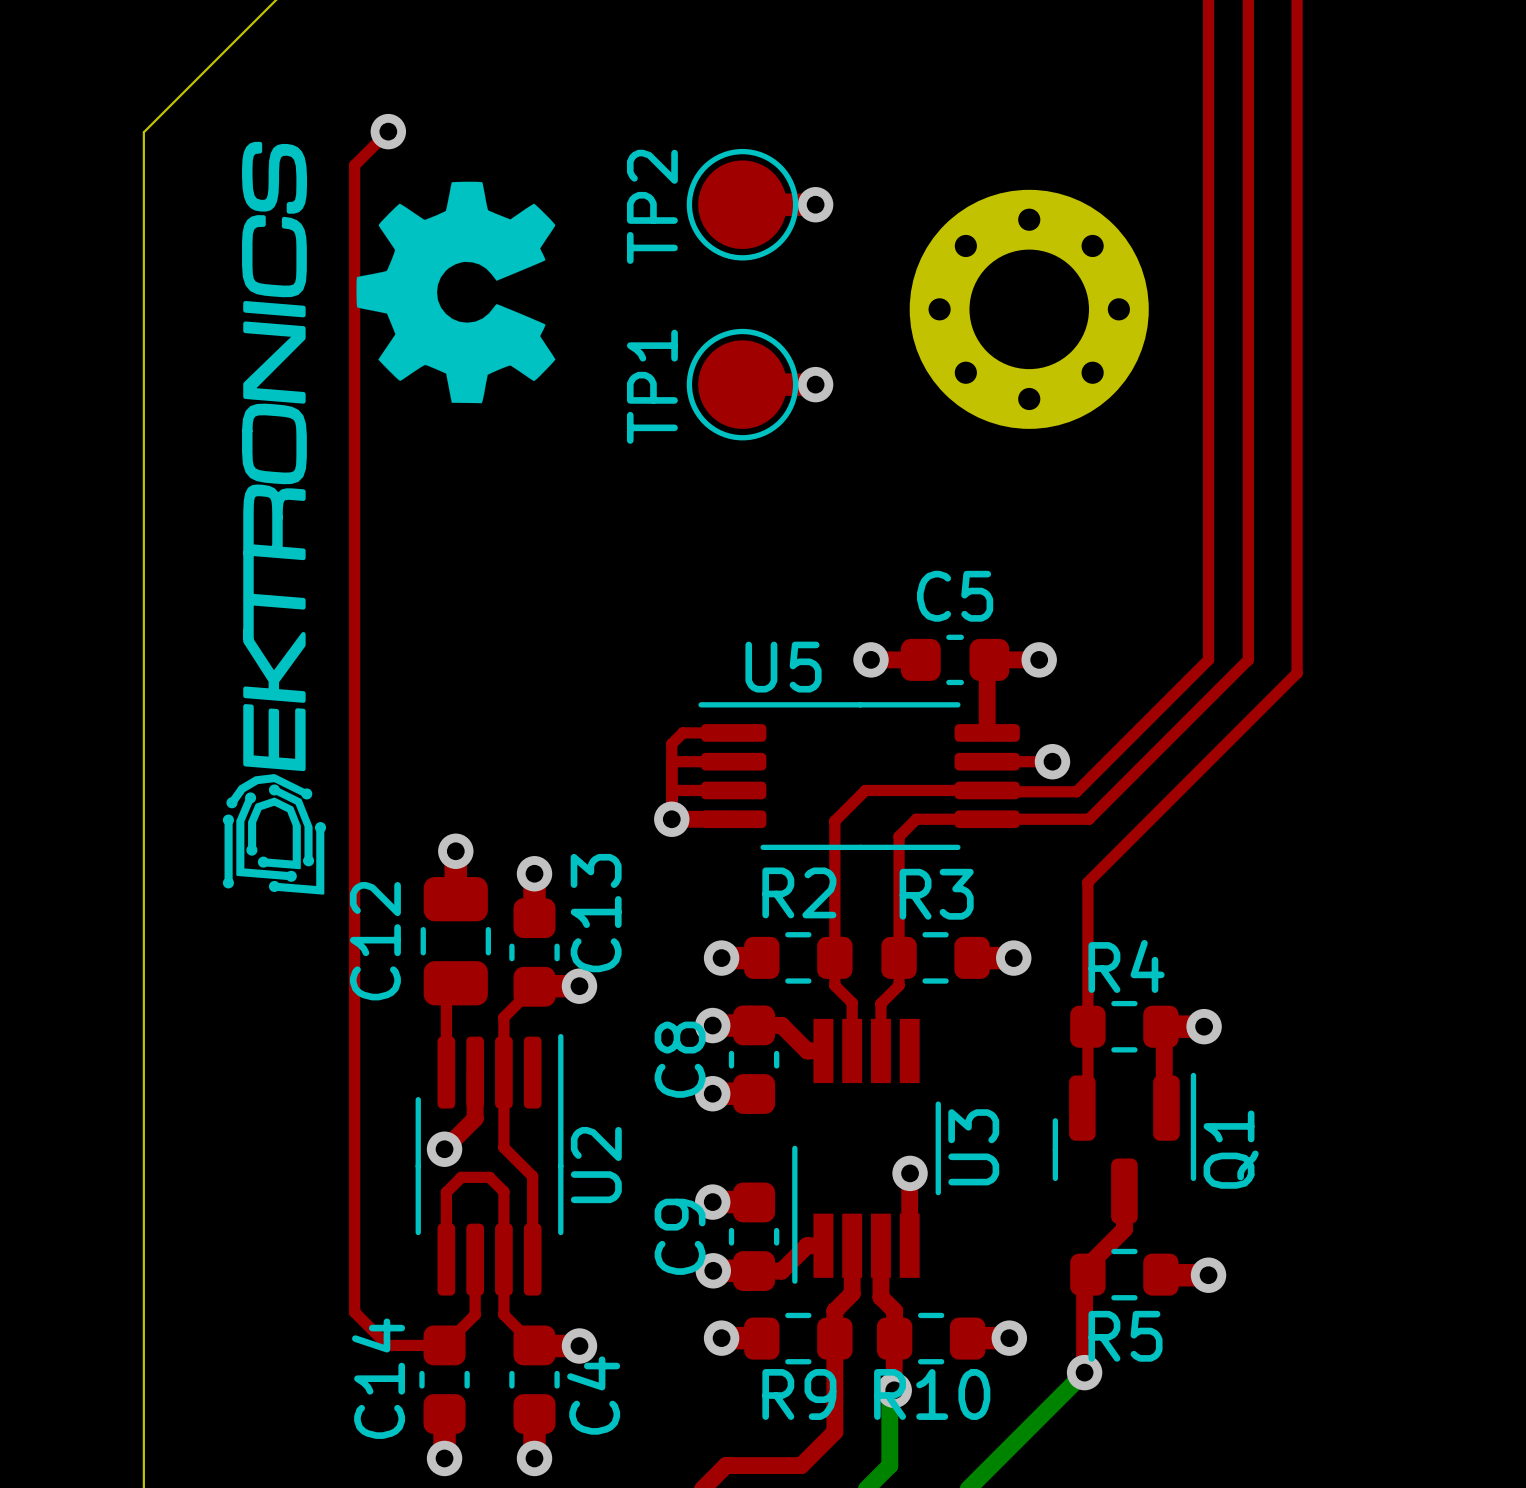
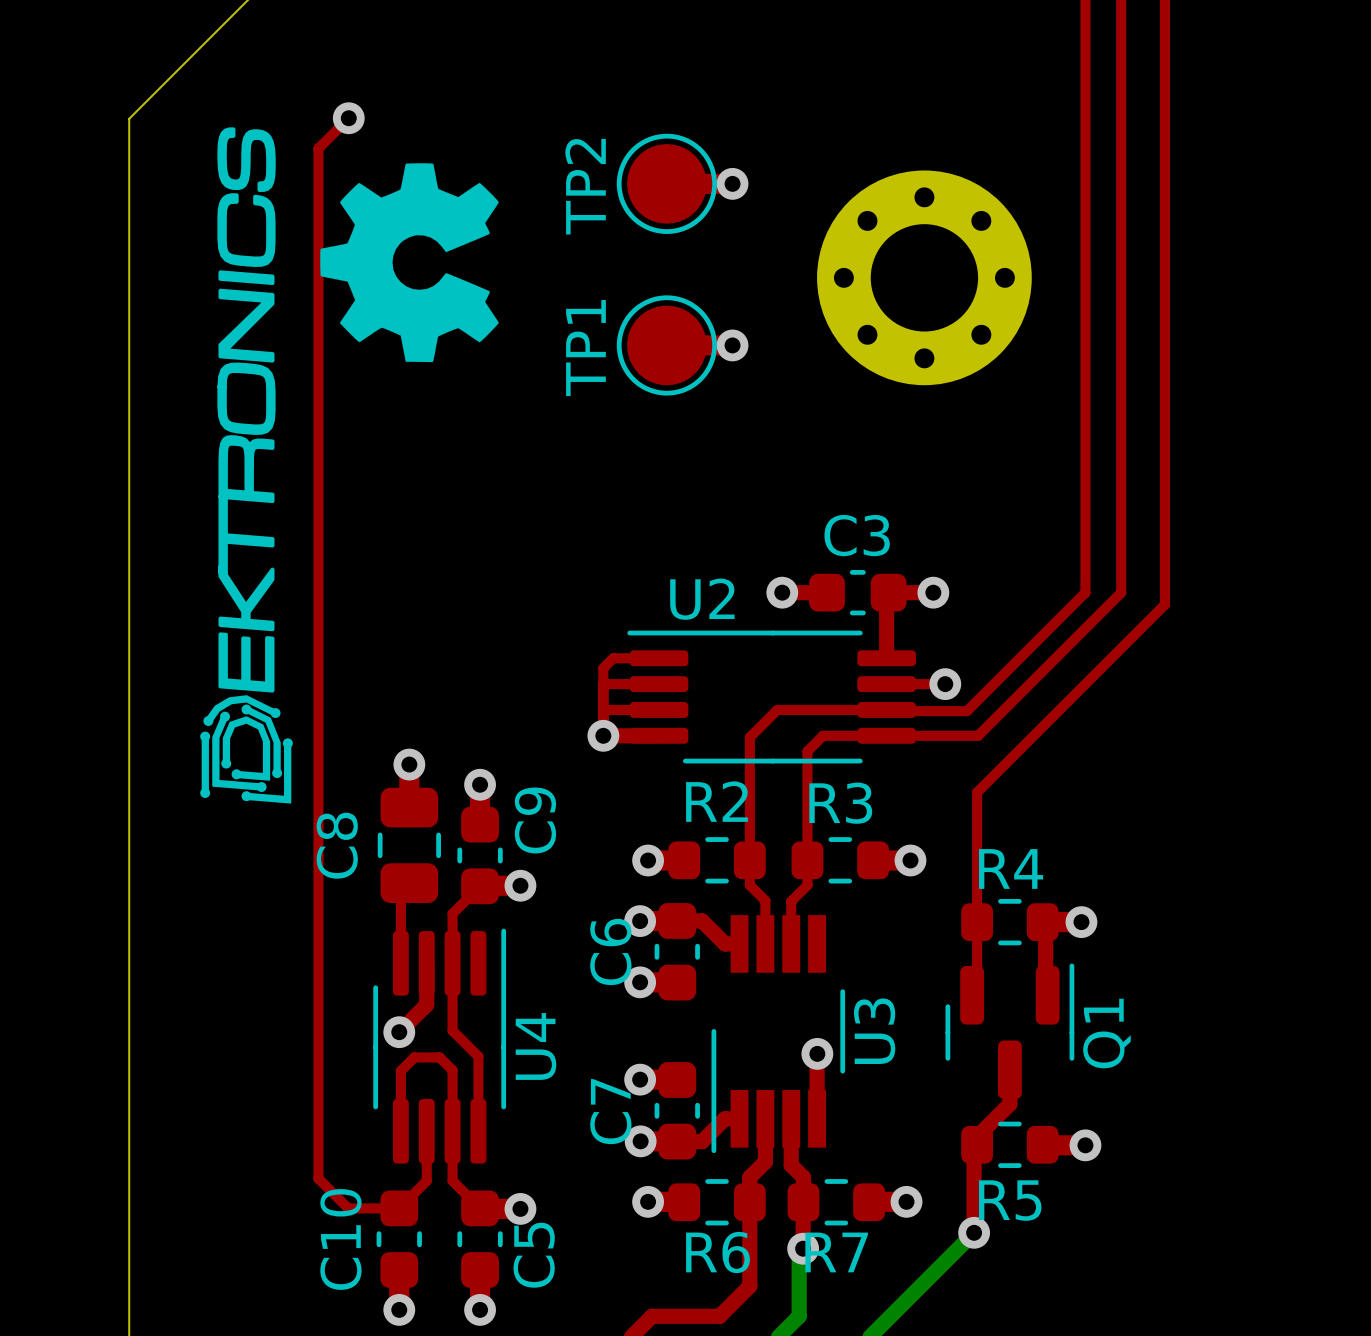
C5 name: C5 (955, 596) -> C3 (857, 535)
U5 name: U5 (783, 667) -> U2 (702, 599)
C13 name: C13 (596, 913) -> C9 (535, 820)
C12 name: C12 (375, 941) -> C8 (337, 845)
C8 name: C8 (680, 1059) -> C6 (610, 951)
U2 name: U2 (596, 1165) -> U4 (535, 1046)
C9 name: C9 (680, 1236) -> C7 (610, 1111)
C14 name: C14 (378, 1378) -> C10 (340, 1239)
R9 name: R9 (799, 1394) -> R6 (717, 1252)
R10 name: R10 (932, 1394) -> R7 (836, 1252)
C4 name: C4 (593, 1395) -> C5 (534, 1255)

